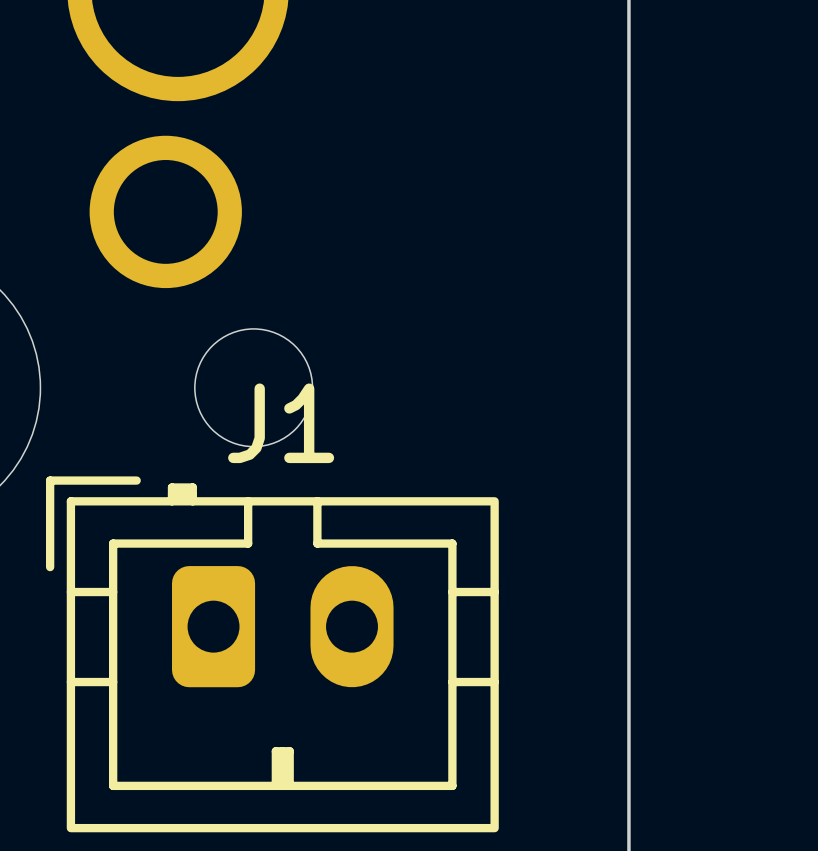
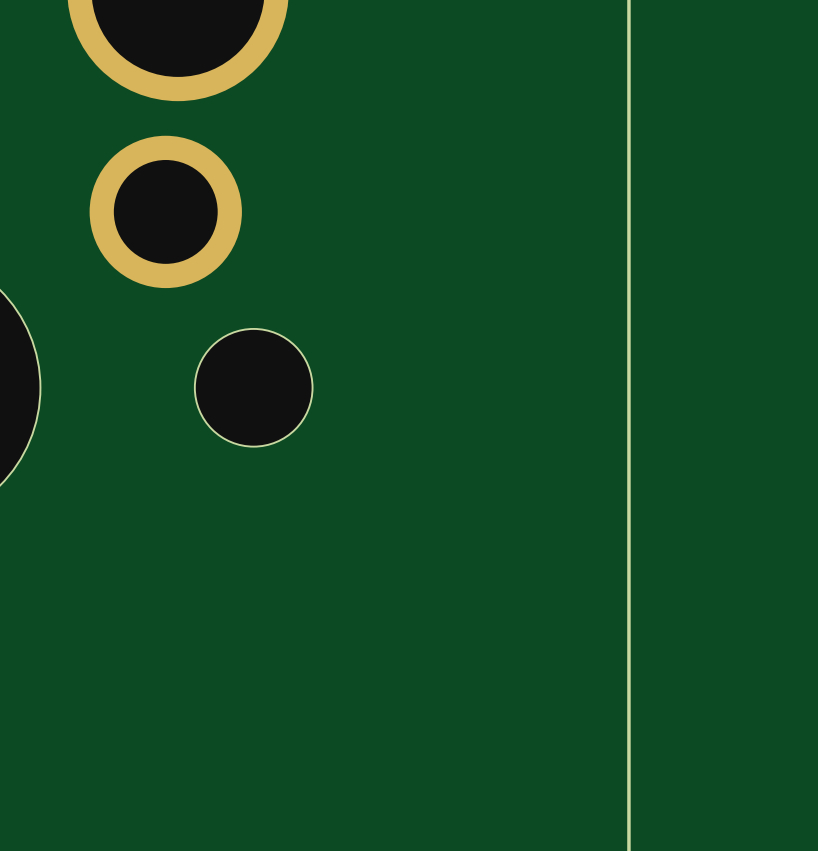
J1: (272, 654) -> none

